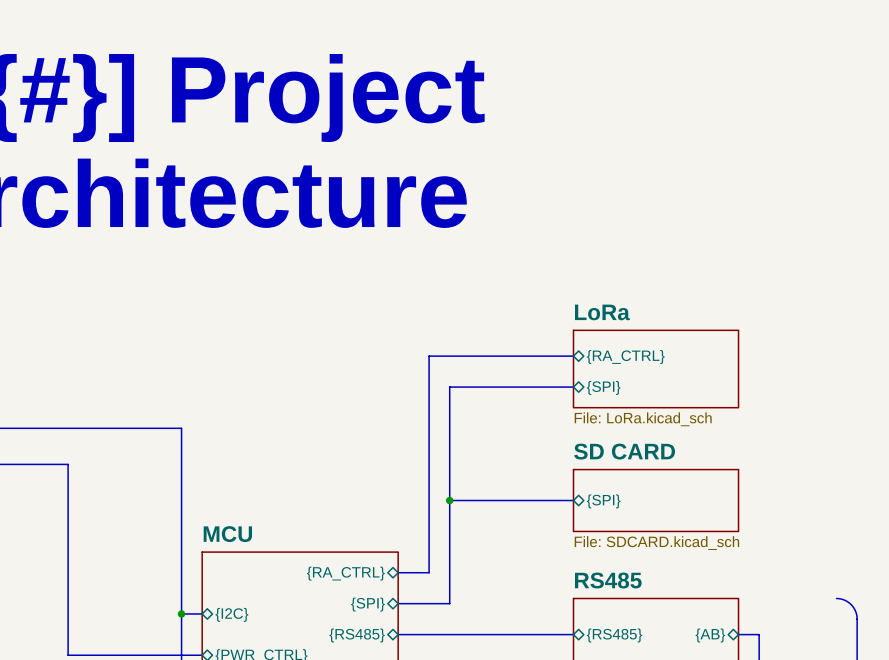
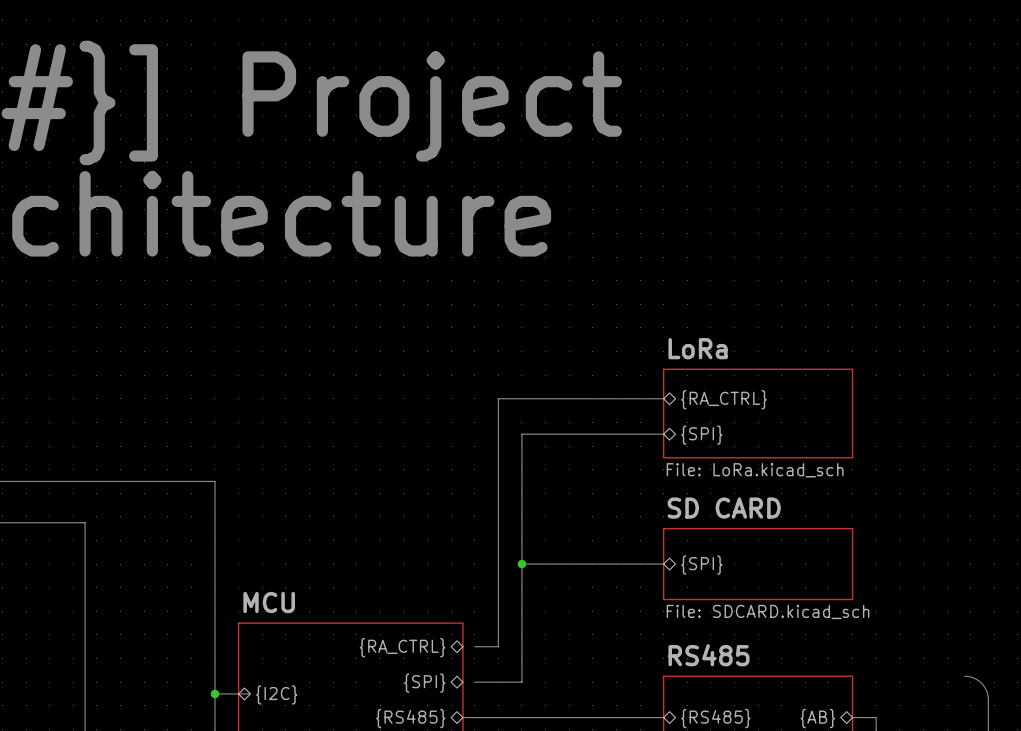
bus: (398, 572) (408, 572) -> none
bus: (398, 603) (408, 603) -> (238, 693) (250, 693)

